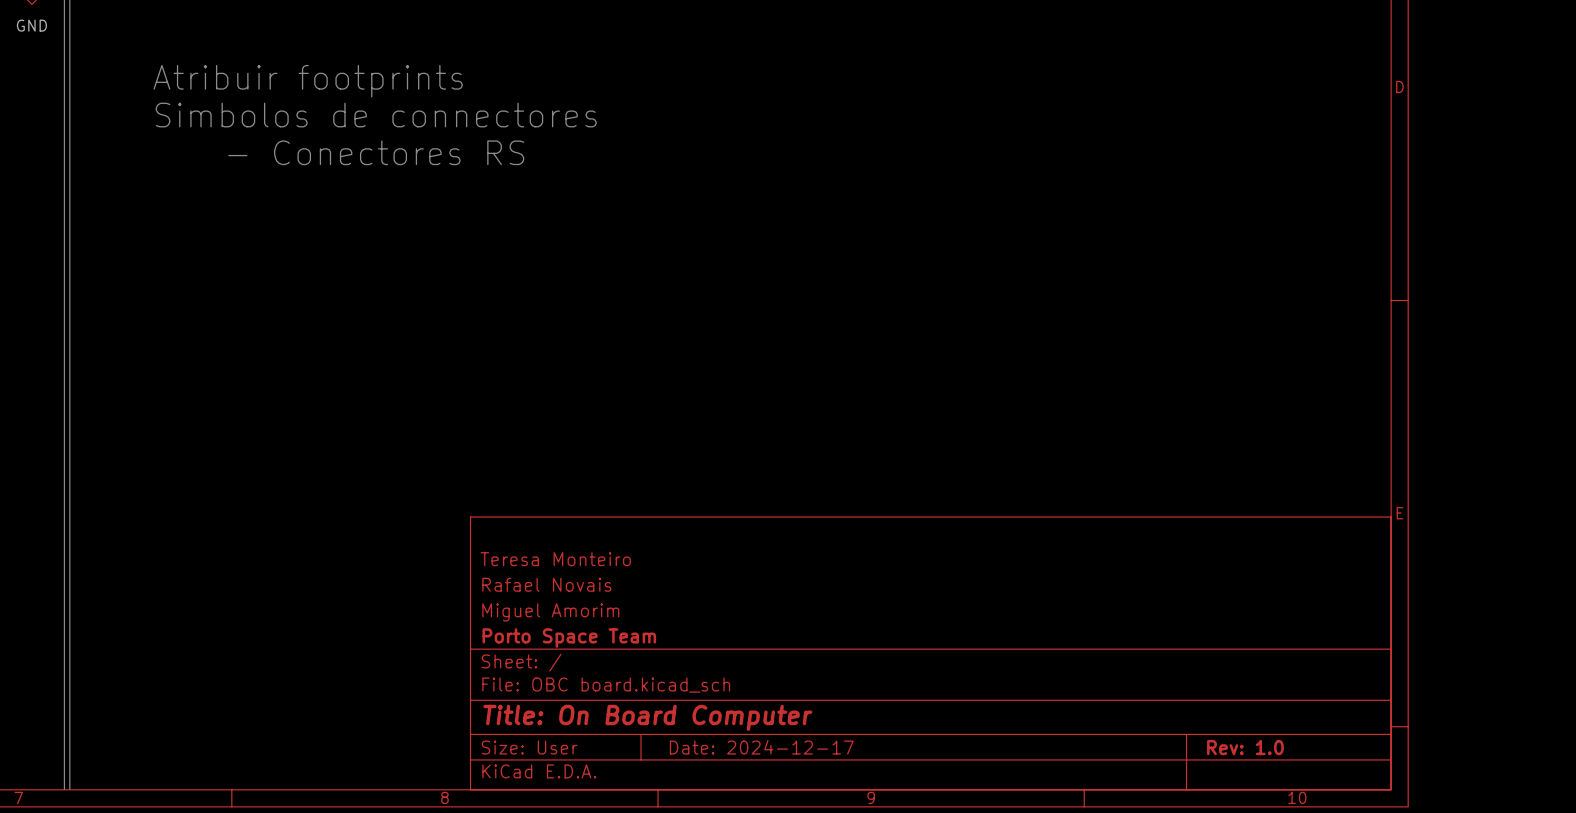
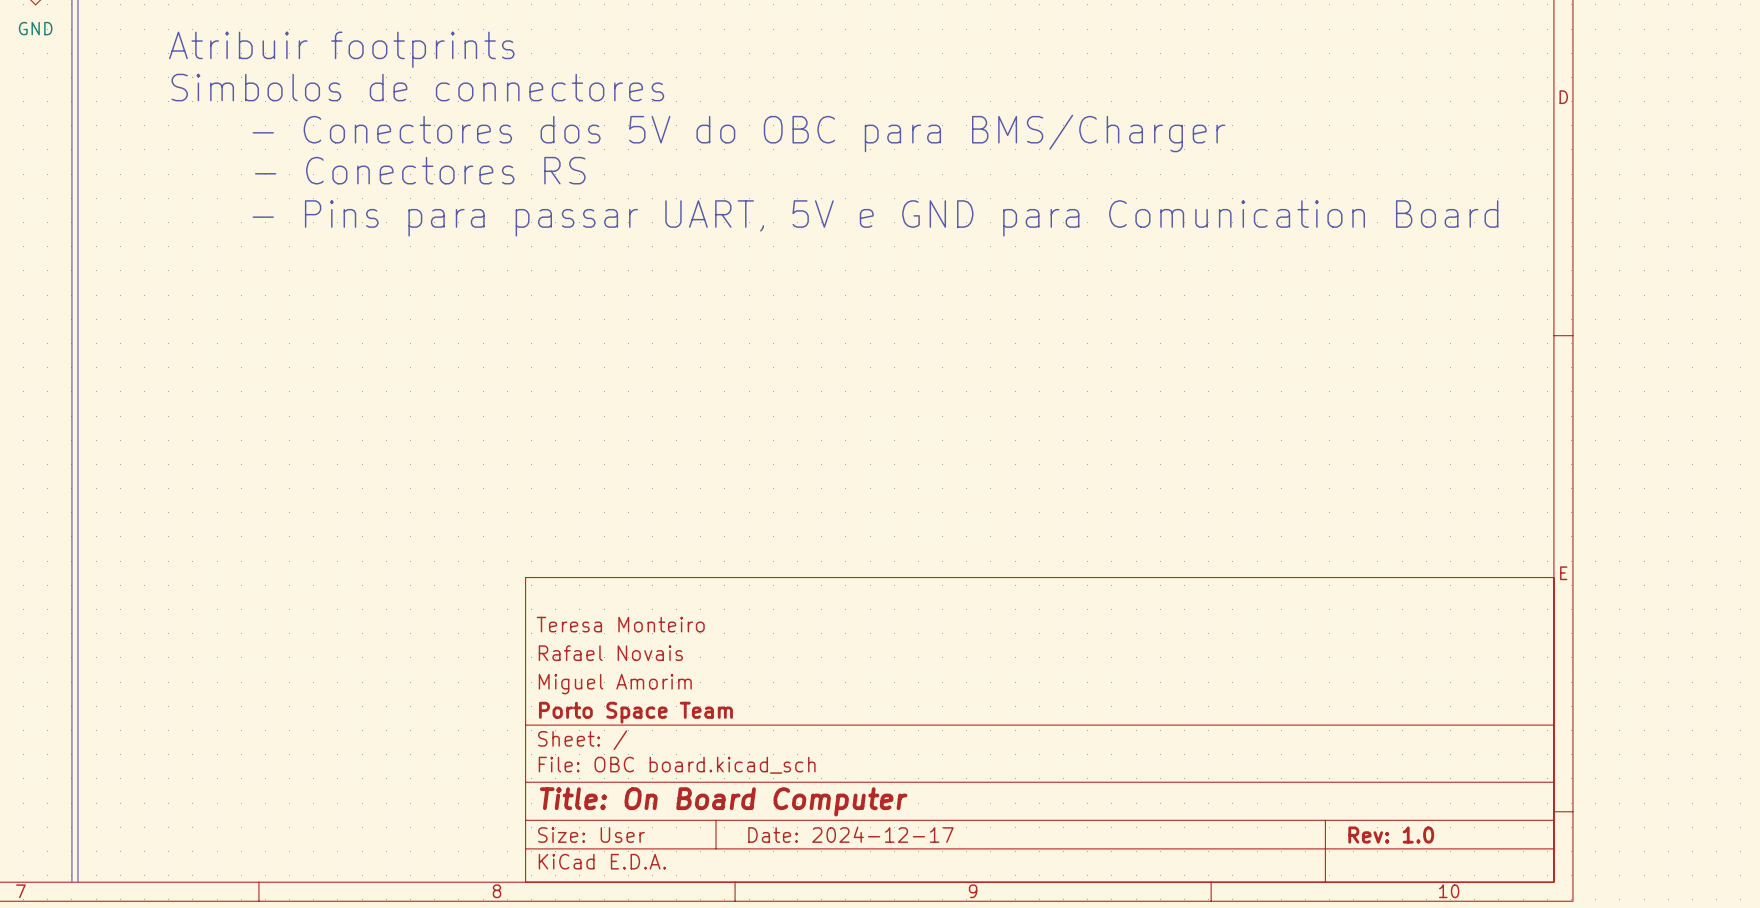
text position: Atribuir footprints (308, 81) -> Atribuir footprints (341, 49)
text position: Simbolos de connectores (376, 115) -> Simbolos de connectores (417, 87)
text: none -> - Conectores dos 5V do OBC para BMS/Charger (738, 133)
text: none -> - Pins para passar UART, 5V e GND para Comunication Board (875, 218)

